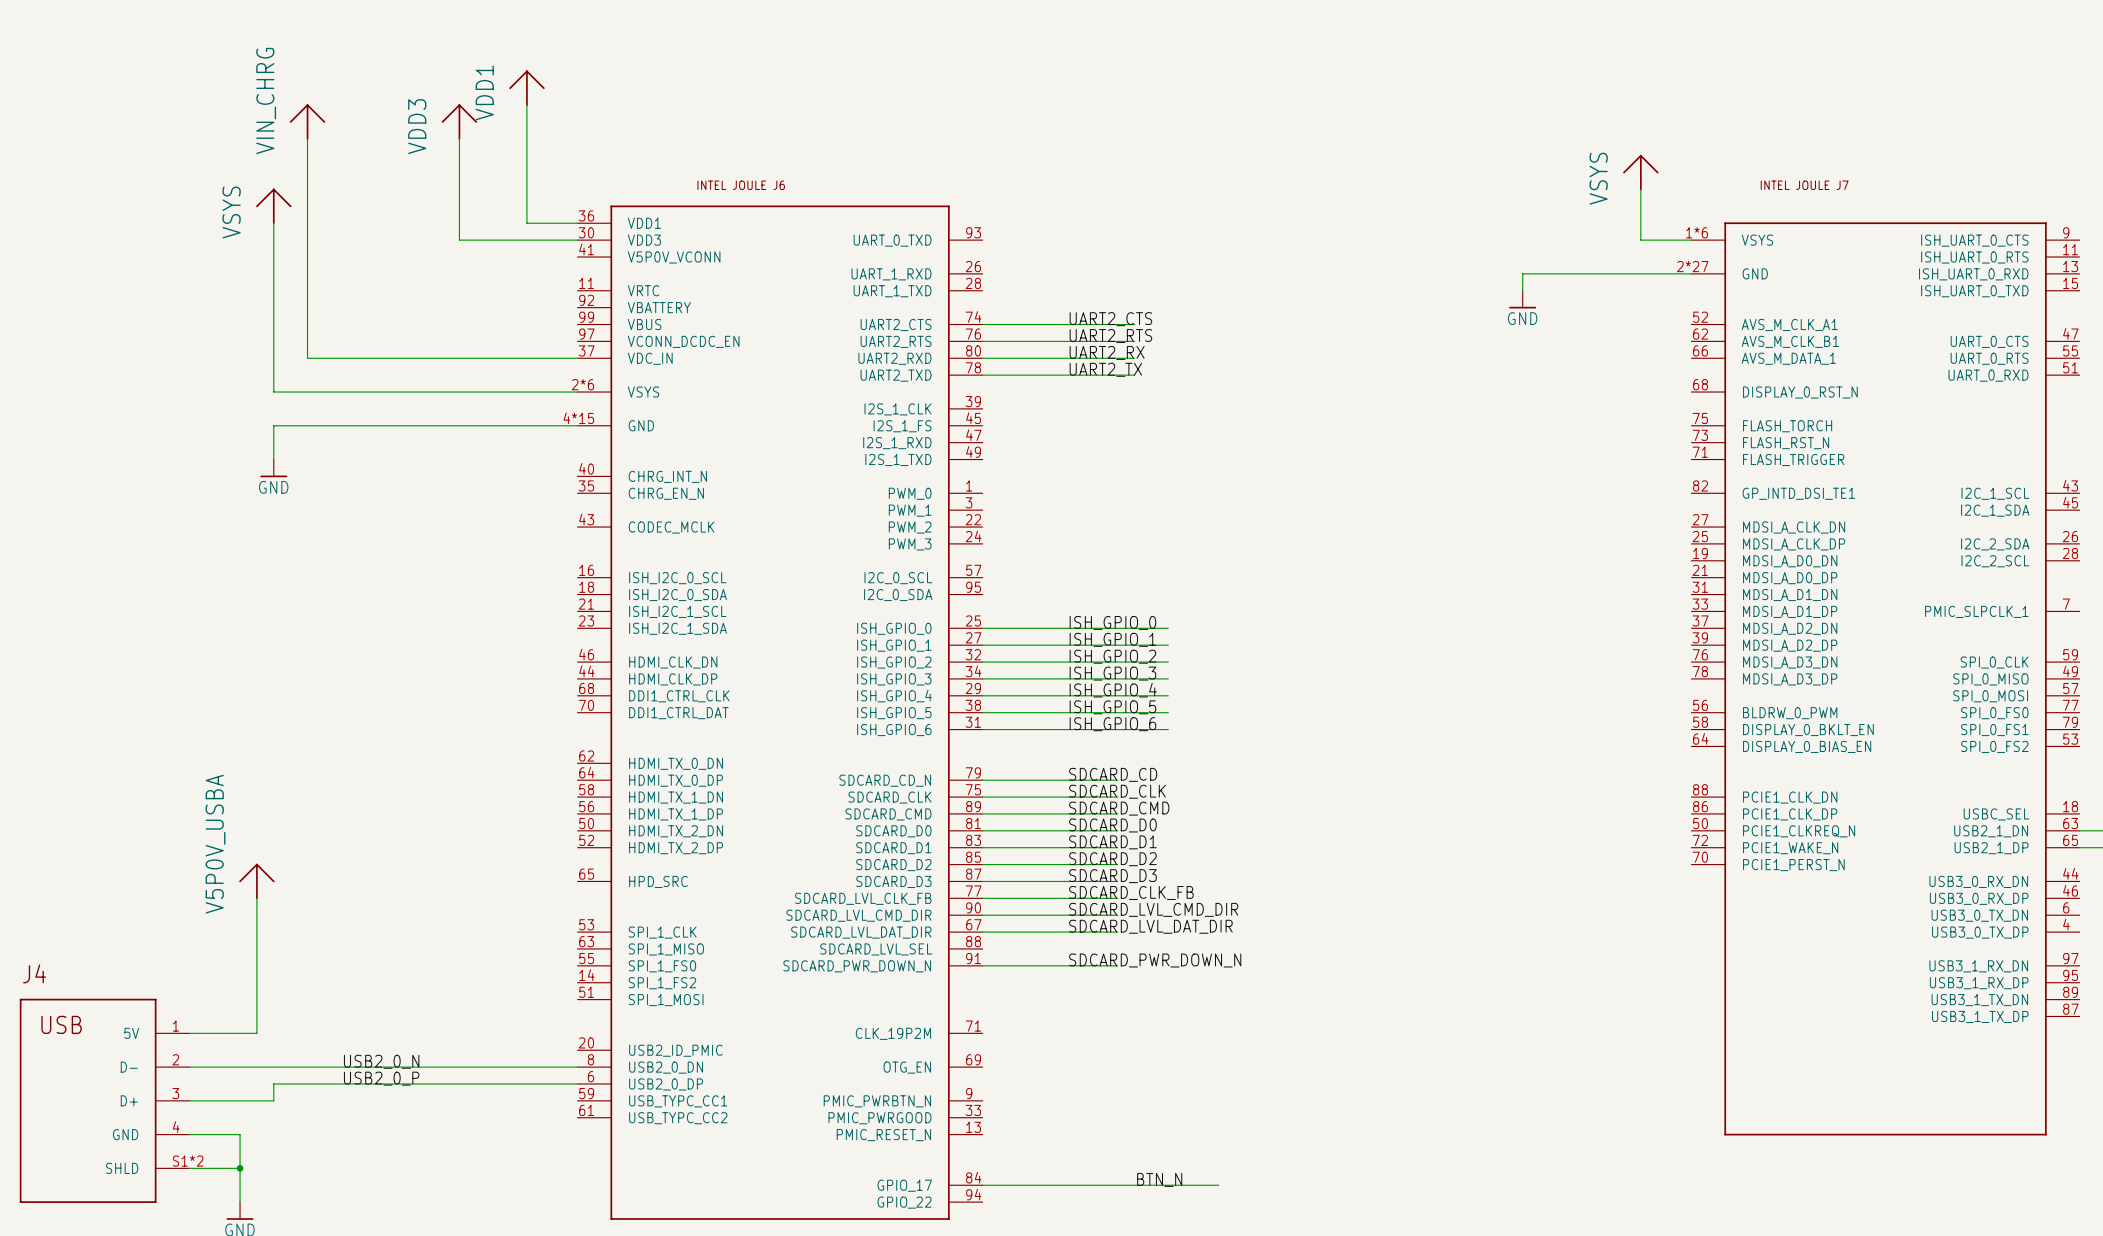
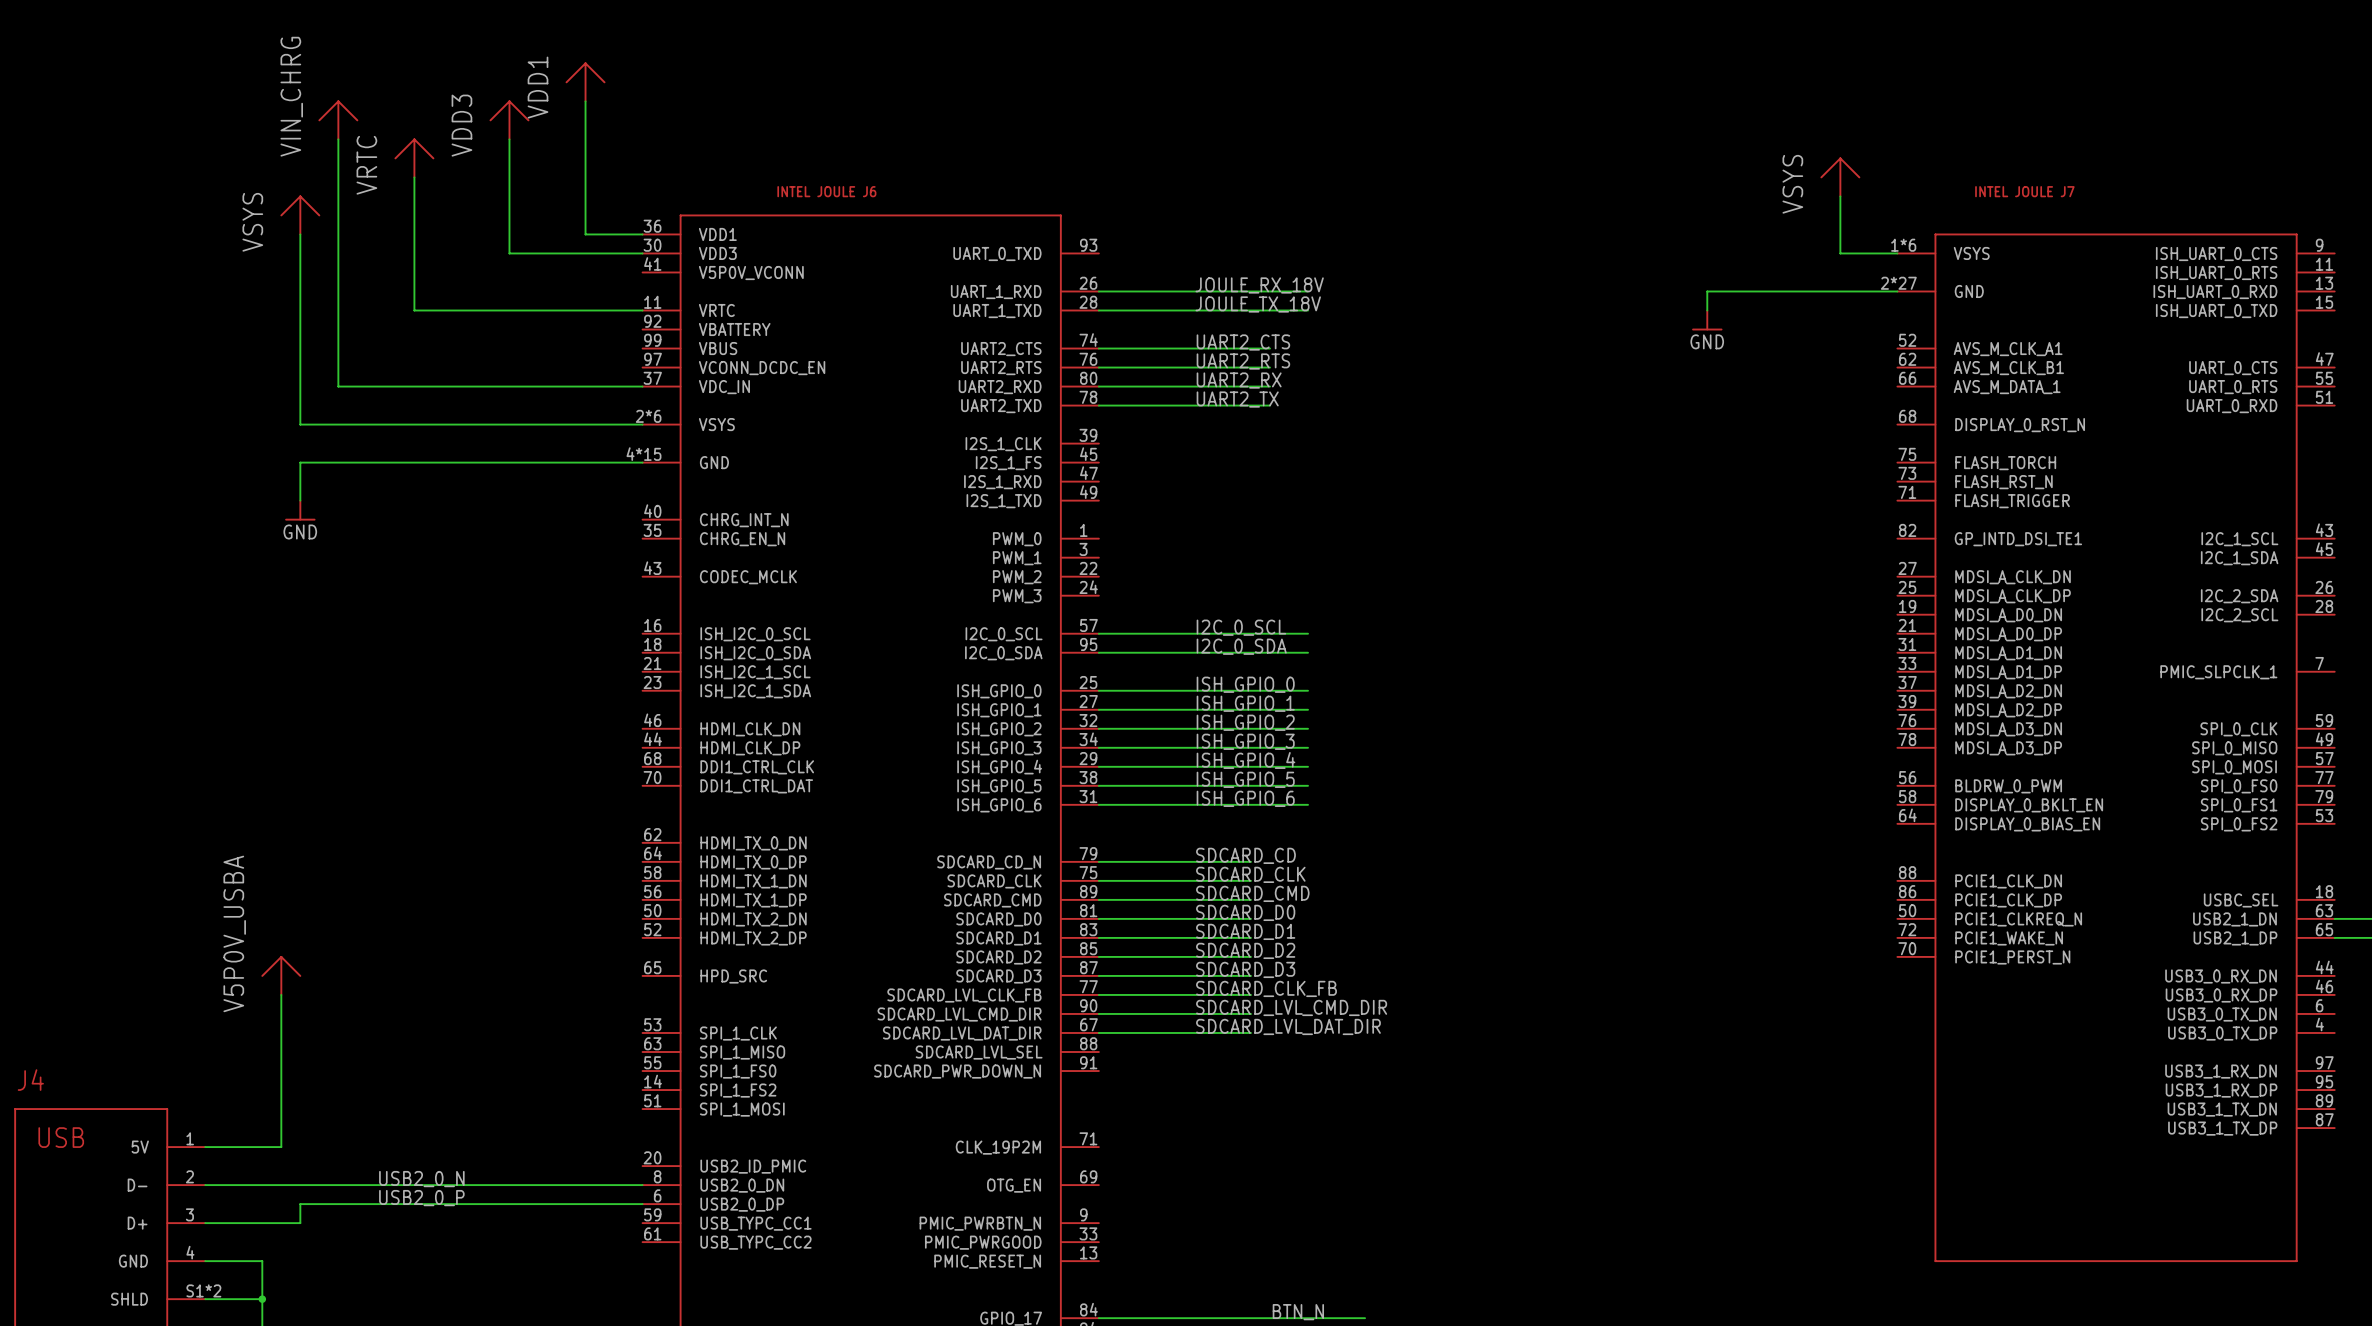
power symbol: none -> VRTC (414, 158)
wire: none -> (414, 177) (414, 310) (642, 310)
label: none -> JOULE_RX_18V (1259, 285)
wire: none -> (1098, 291) (1308, 291)
label: none -> JOULE_TX_18V (1258, 304)
wire: none -> (1098, 310) (1308, 310)
label: none -> I2C_0_SCL (1241, 627)
wire: none -> (1098, 633) (1308, 633)
label: none -> I2C_0_SDA (1241, 646)
wire: none -> (1098, 652) (1308, 652)
label: SDCARD_PWR_DOWN_N (1155, 960) -> none
wire: (982, 965) (1117, 965) -> none

